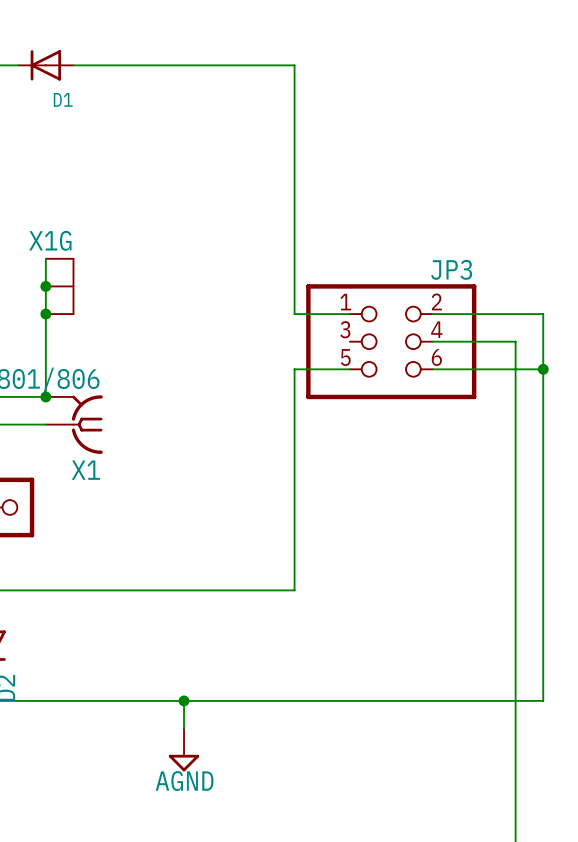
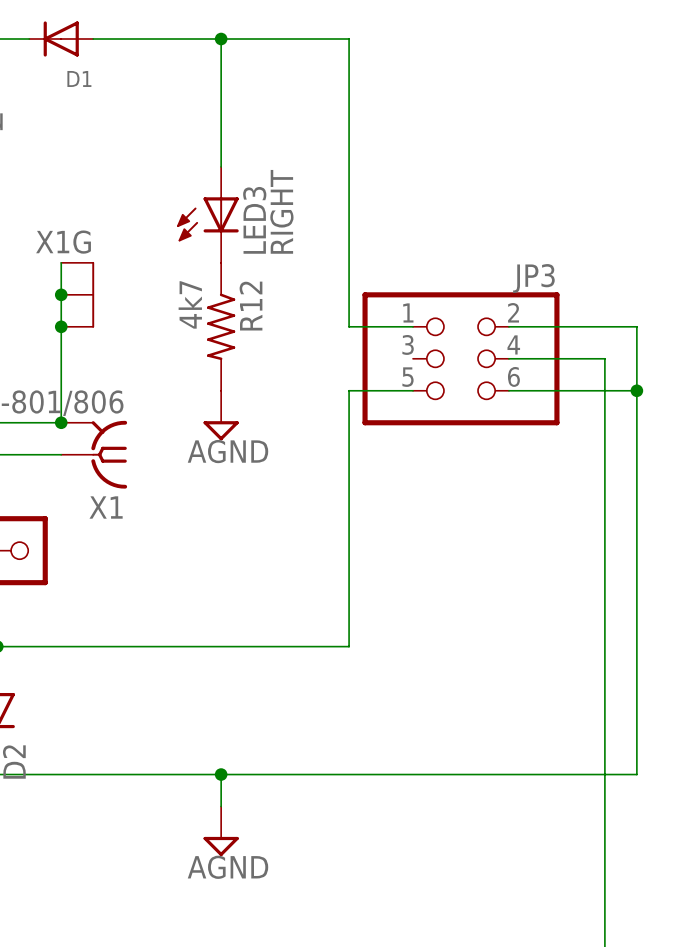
wire: none -> (221, 38) (221, 166)
junction: none -> (221, 38)
LED3: none -> RIGHT (207, 214)
R12: none -> 4k7 (221, 326)
power symbol: none -> AGND (221, 415)

